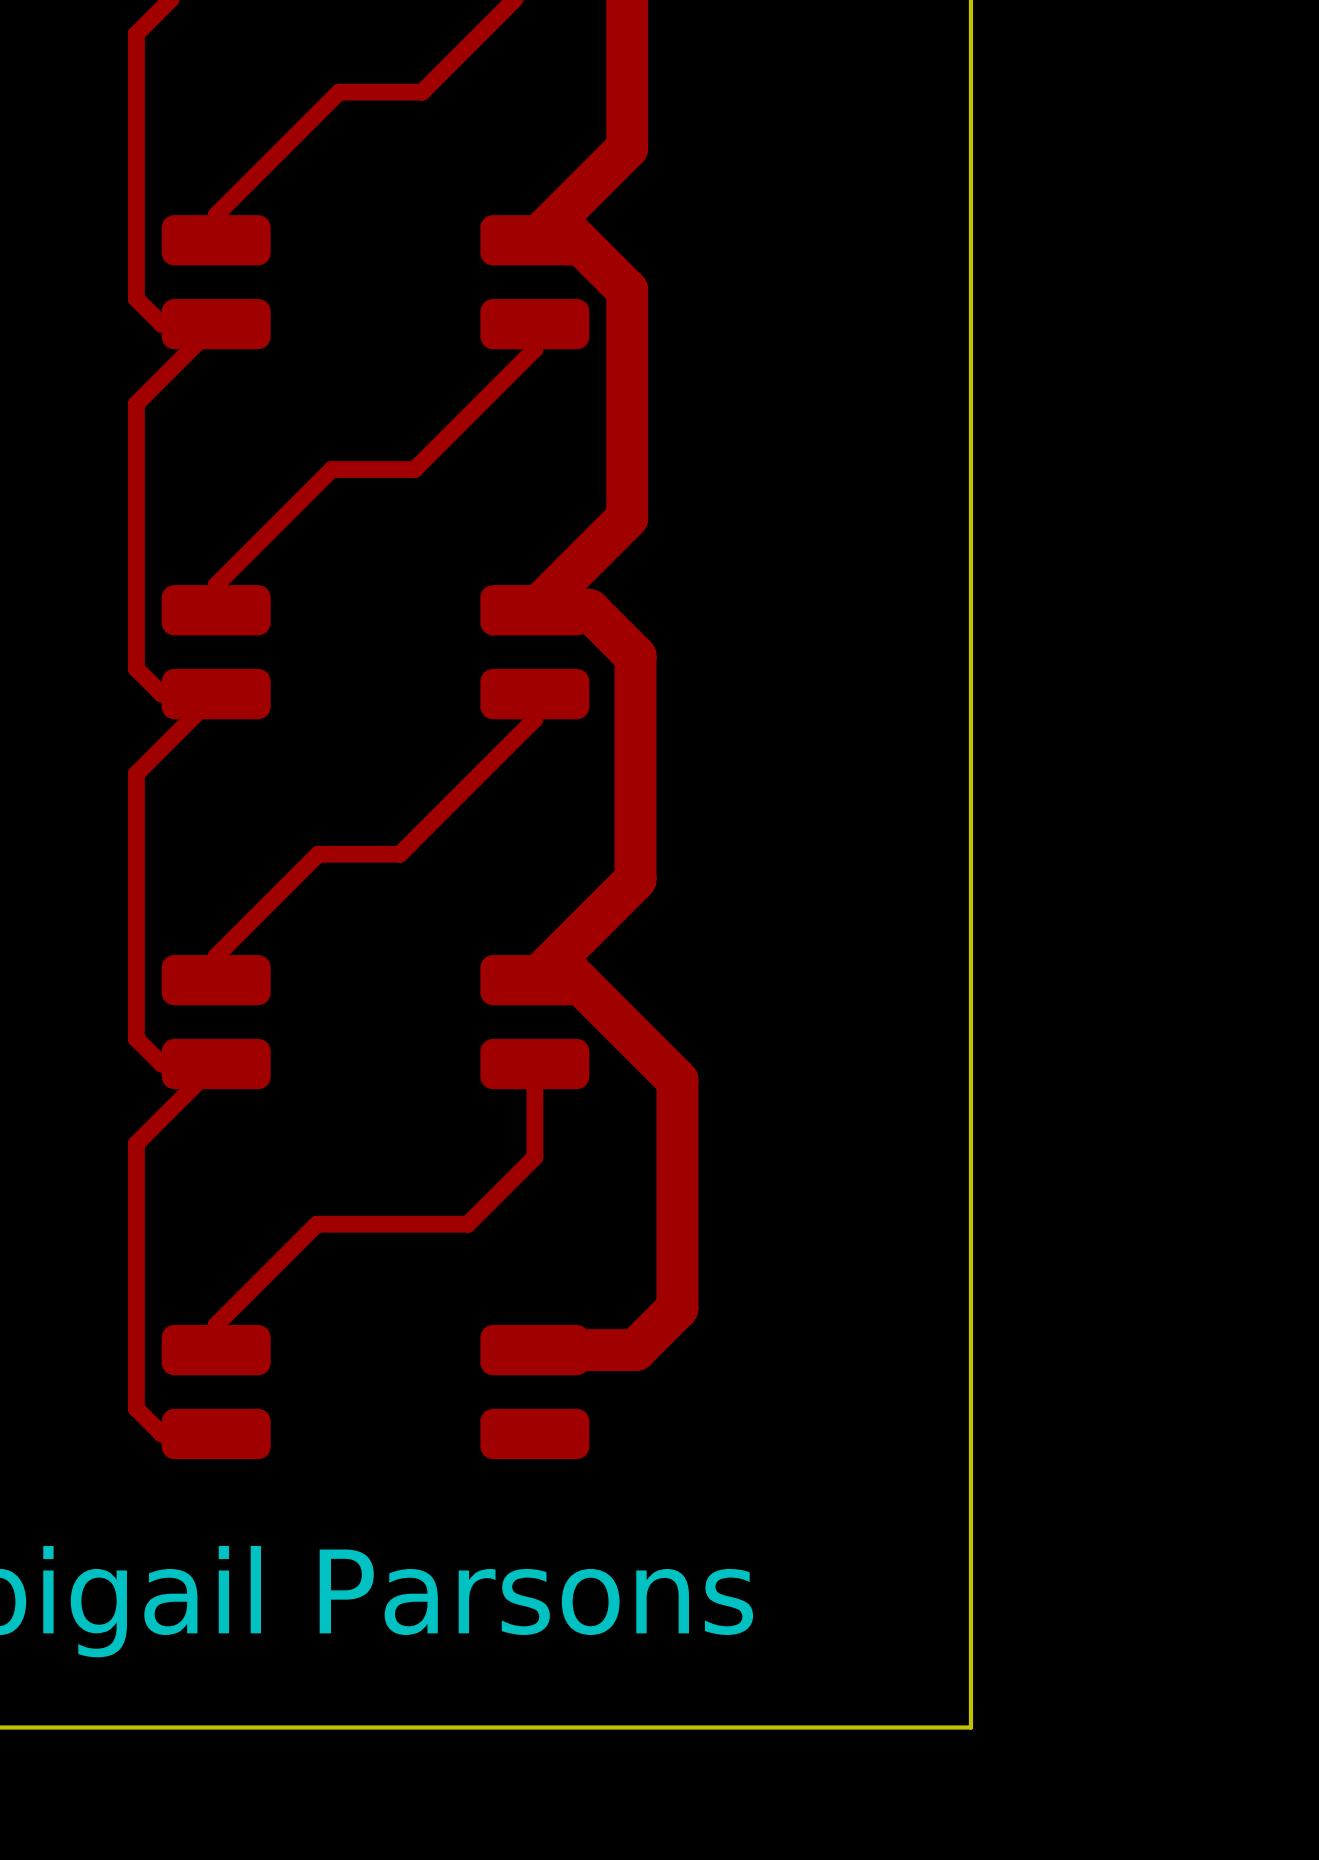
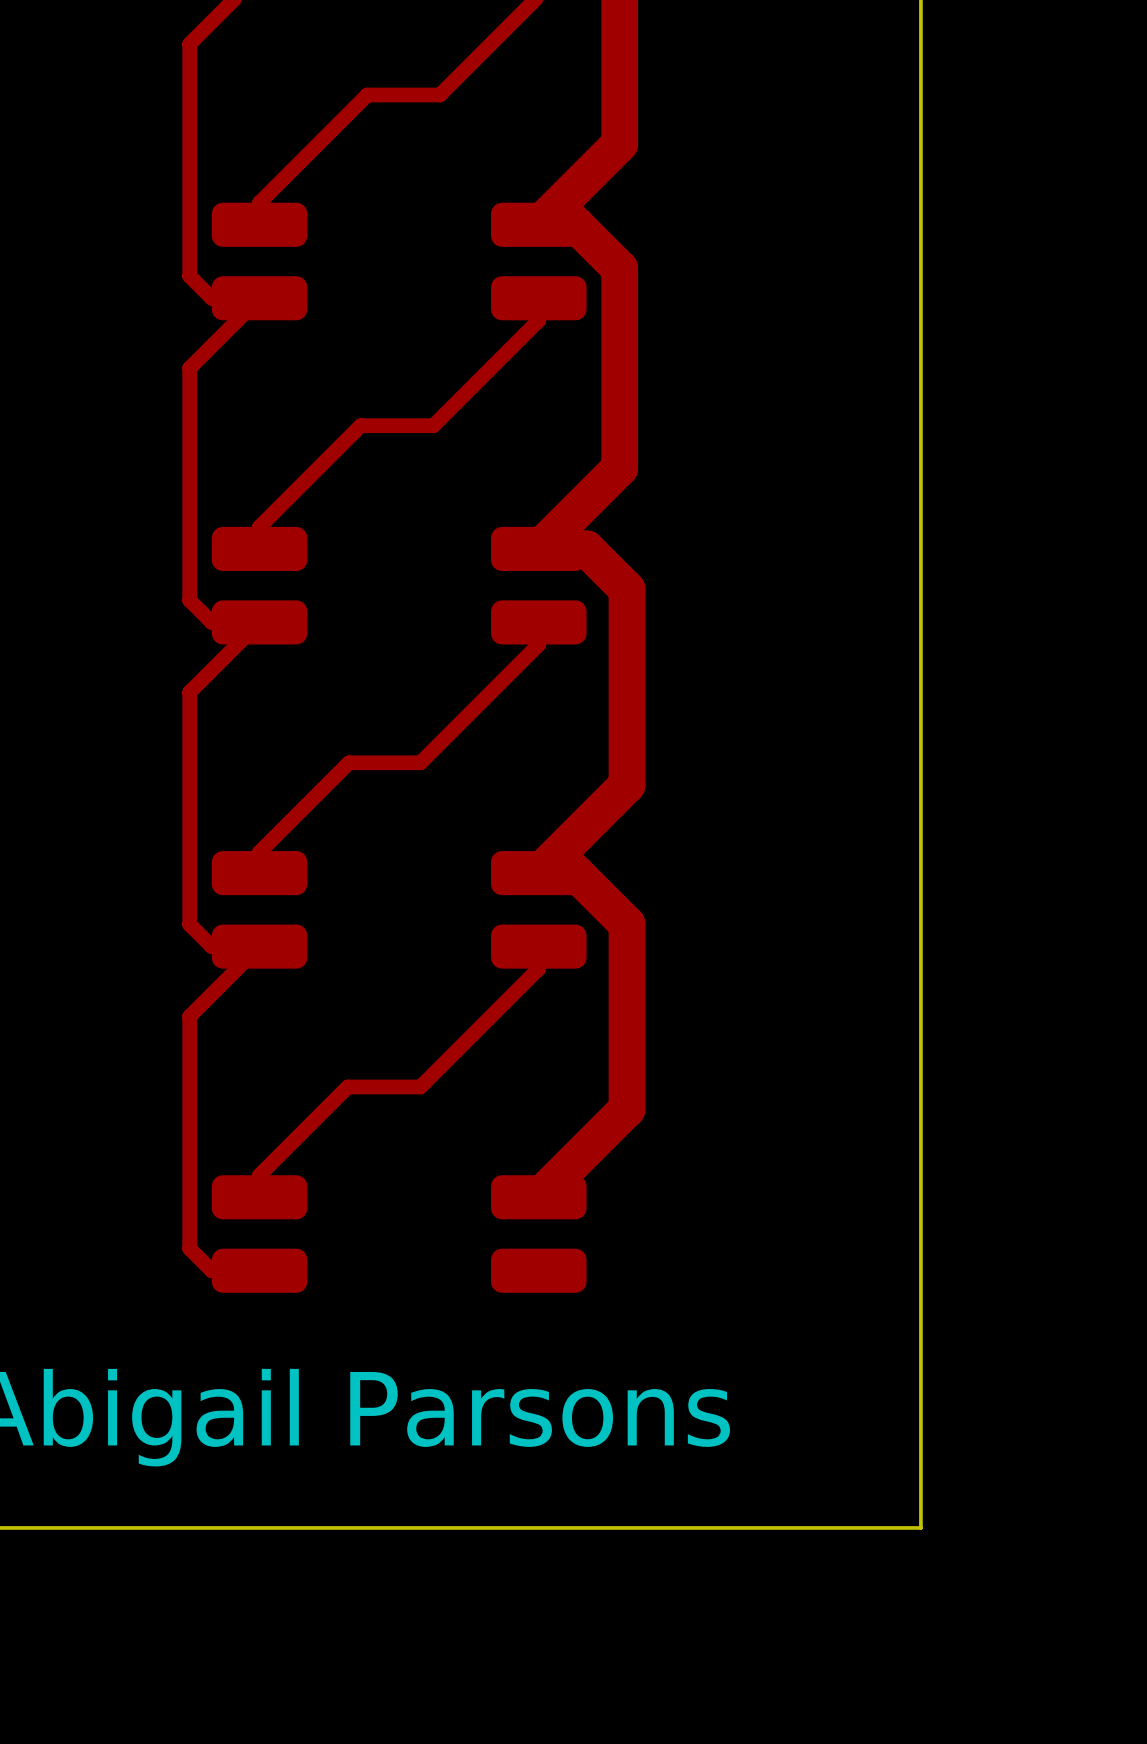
top track: (635, 1038) (677, 1080) (677, 1308) (635, 1350) (534, 1350) -> (626, 924) (626, 1109) (538, 1197)
top track: (534, 1089) (534, 1157) (467, 1224) (399, 1224) -> (538, 968) (420, 1086)

